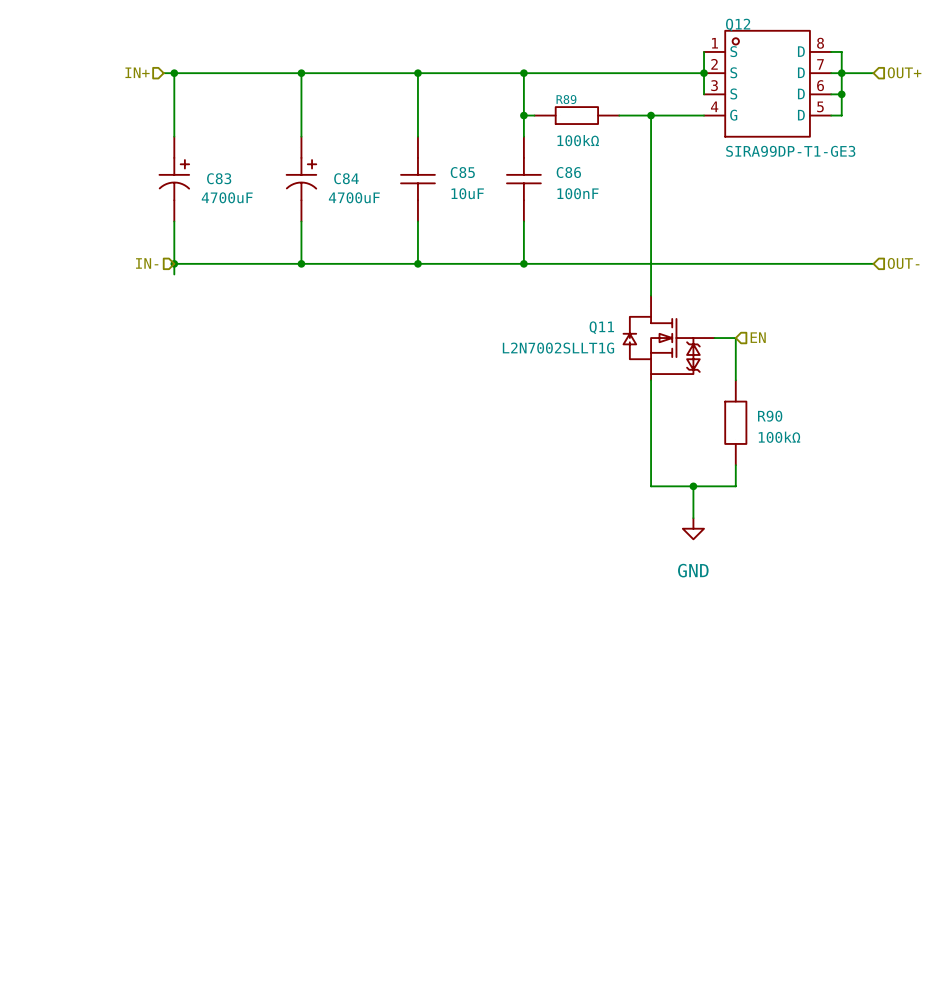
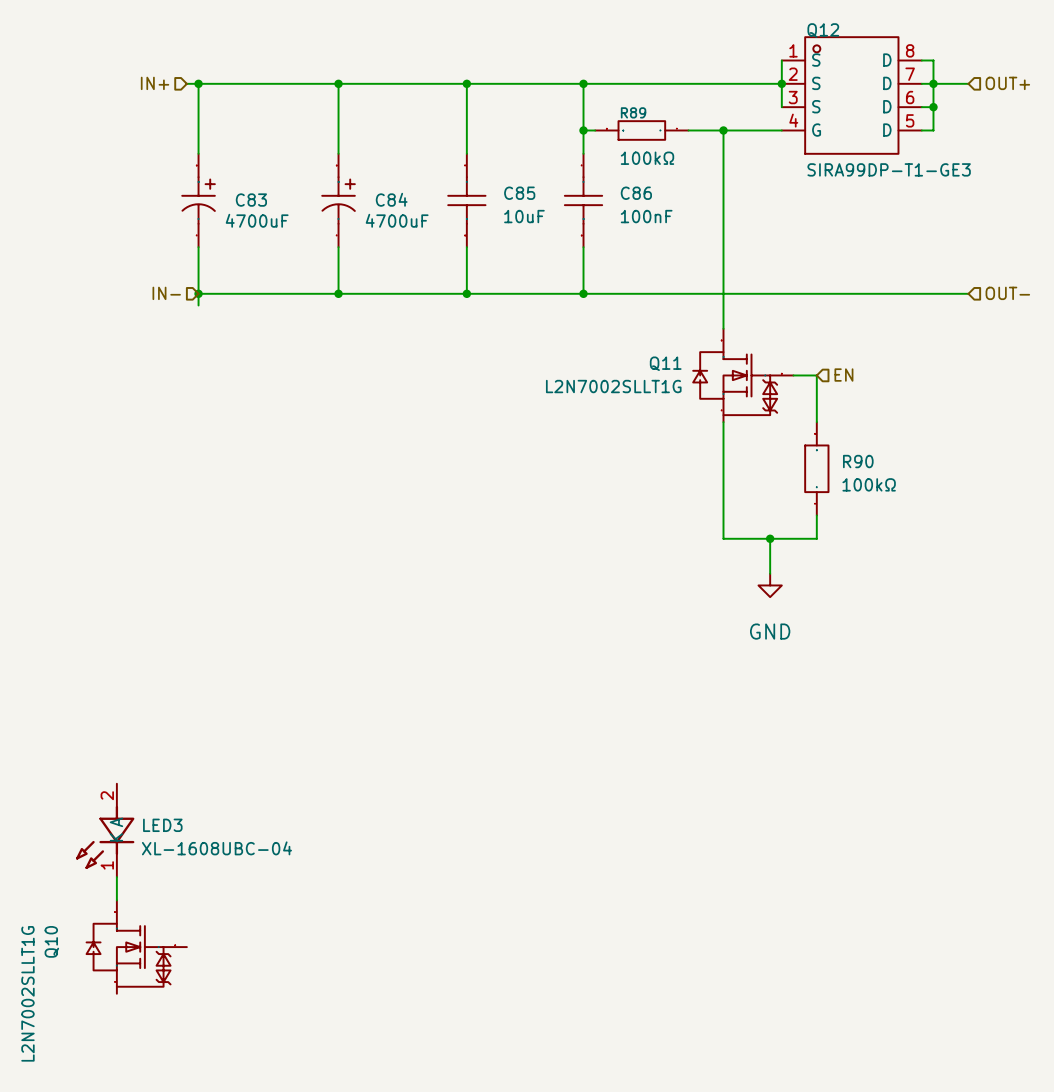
LED3: none -> XL-1608UBC-04 (105, 830)
wire: none -> (116, 877) (116, 900)
Q10: none -> L2N7002SLLT1G (136, 947)

